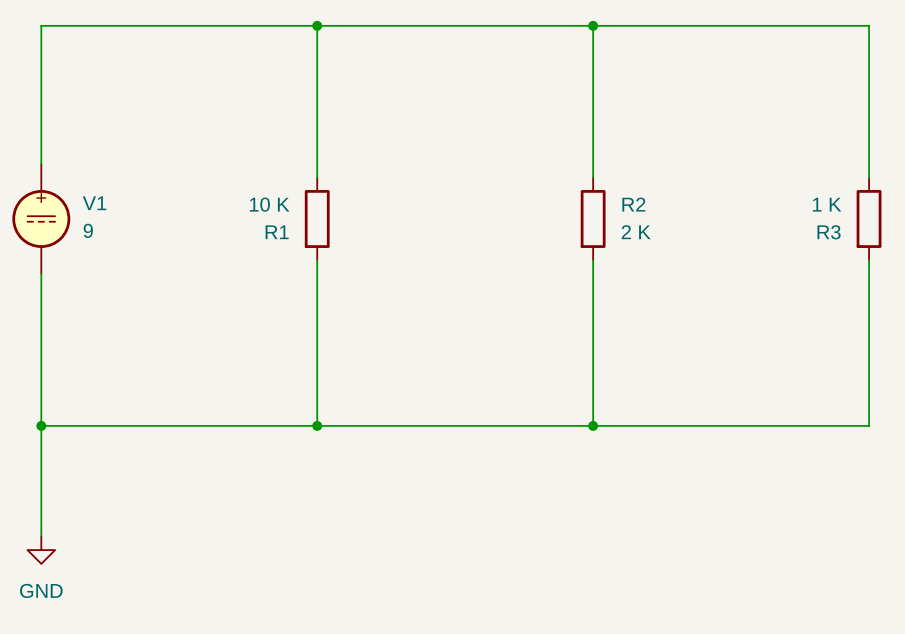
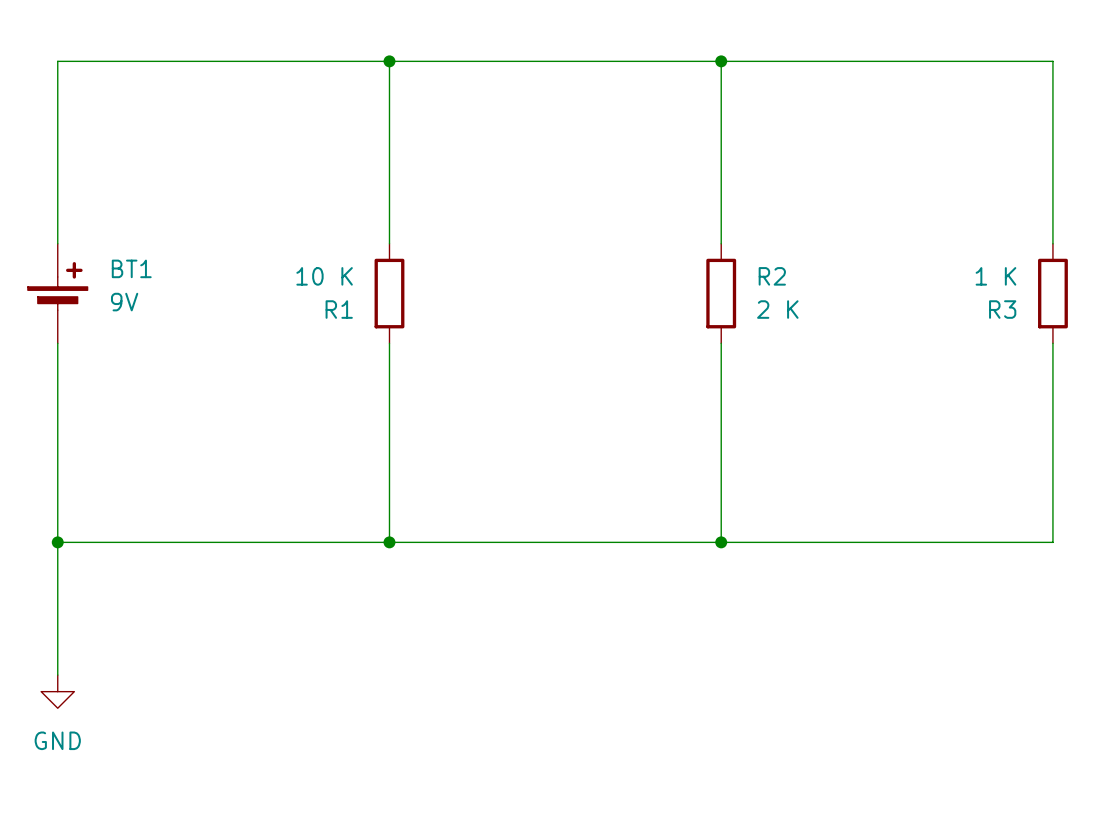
V1: 9 (41, 218) -> none
BT1: none -> 9V (57, 293)

